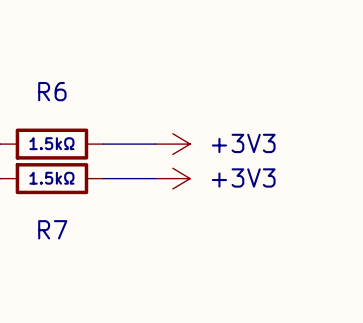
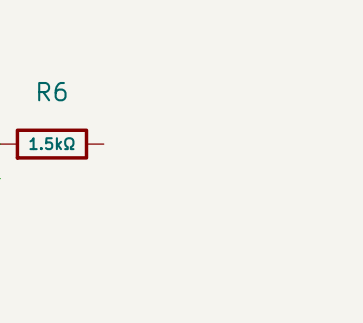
wire: (103, 144) (155, 144) -> none
power symbol: +3V3 (172, 144) -> none
R7: 1.5kΩ (51, 178) -> none
wire: (103, 178) (155, 178) -> none
power symbol: +3V3 (172, 178) -> none

